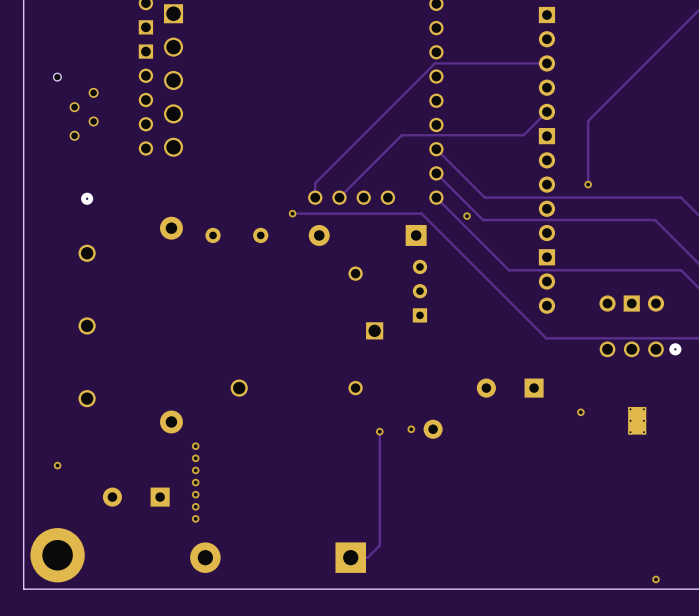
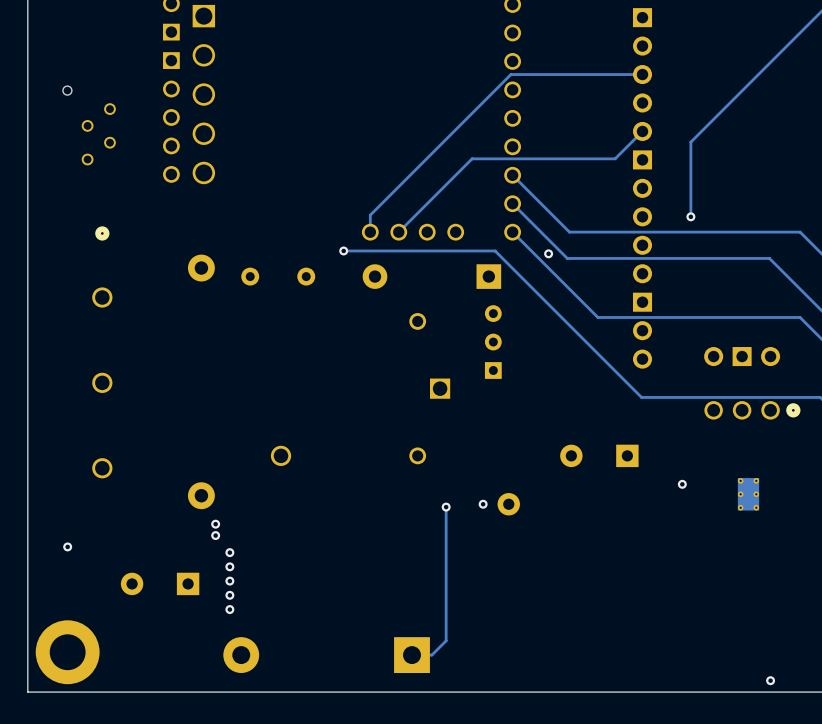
via: none -> (215, 524)
via: (195, 446) -> none
via: none -> (215, 535)
via: (195, 458) -> none

